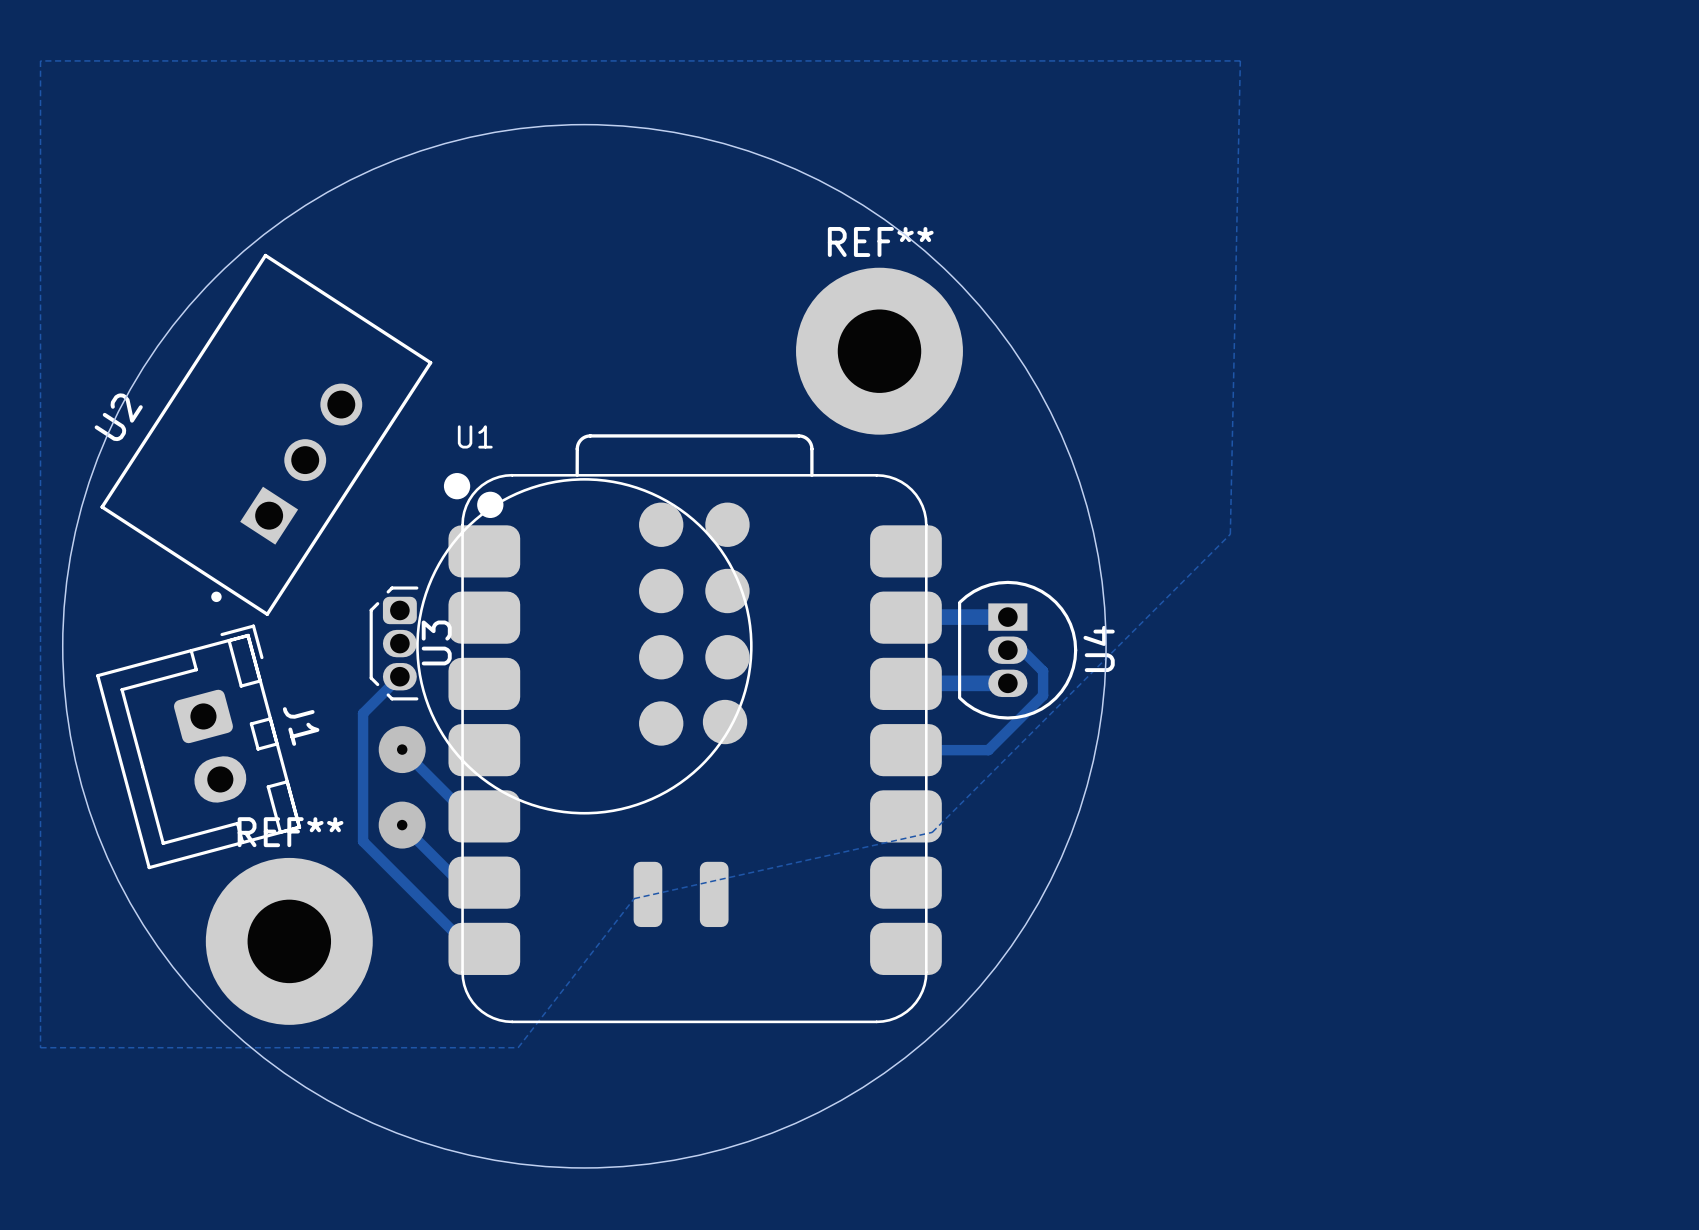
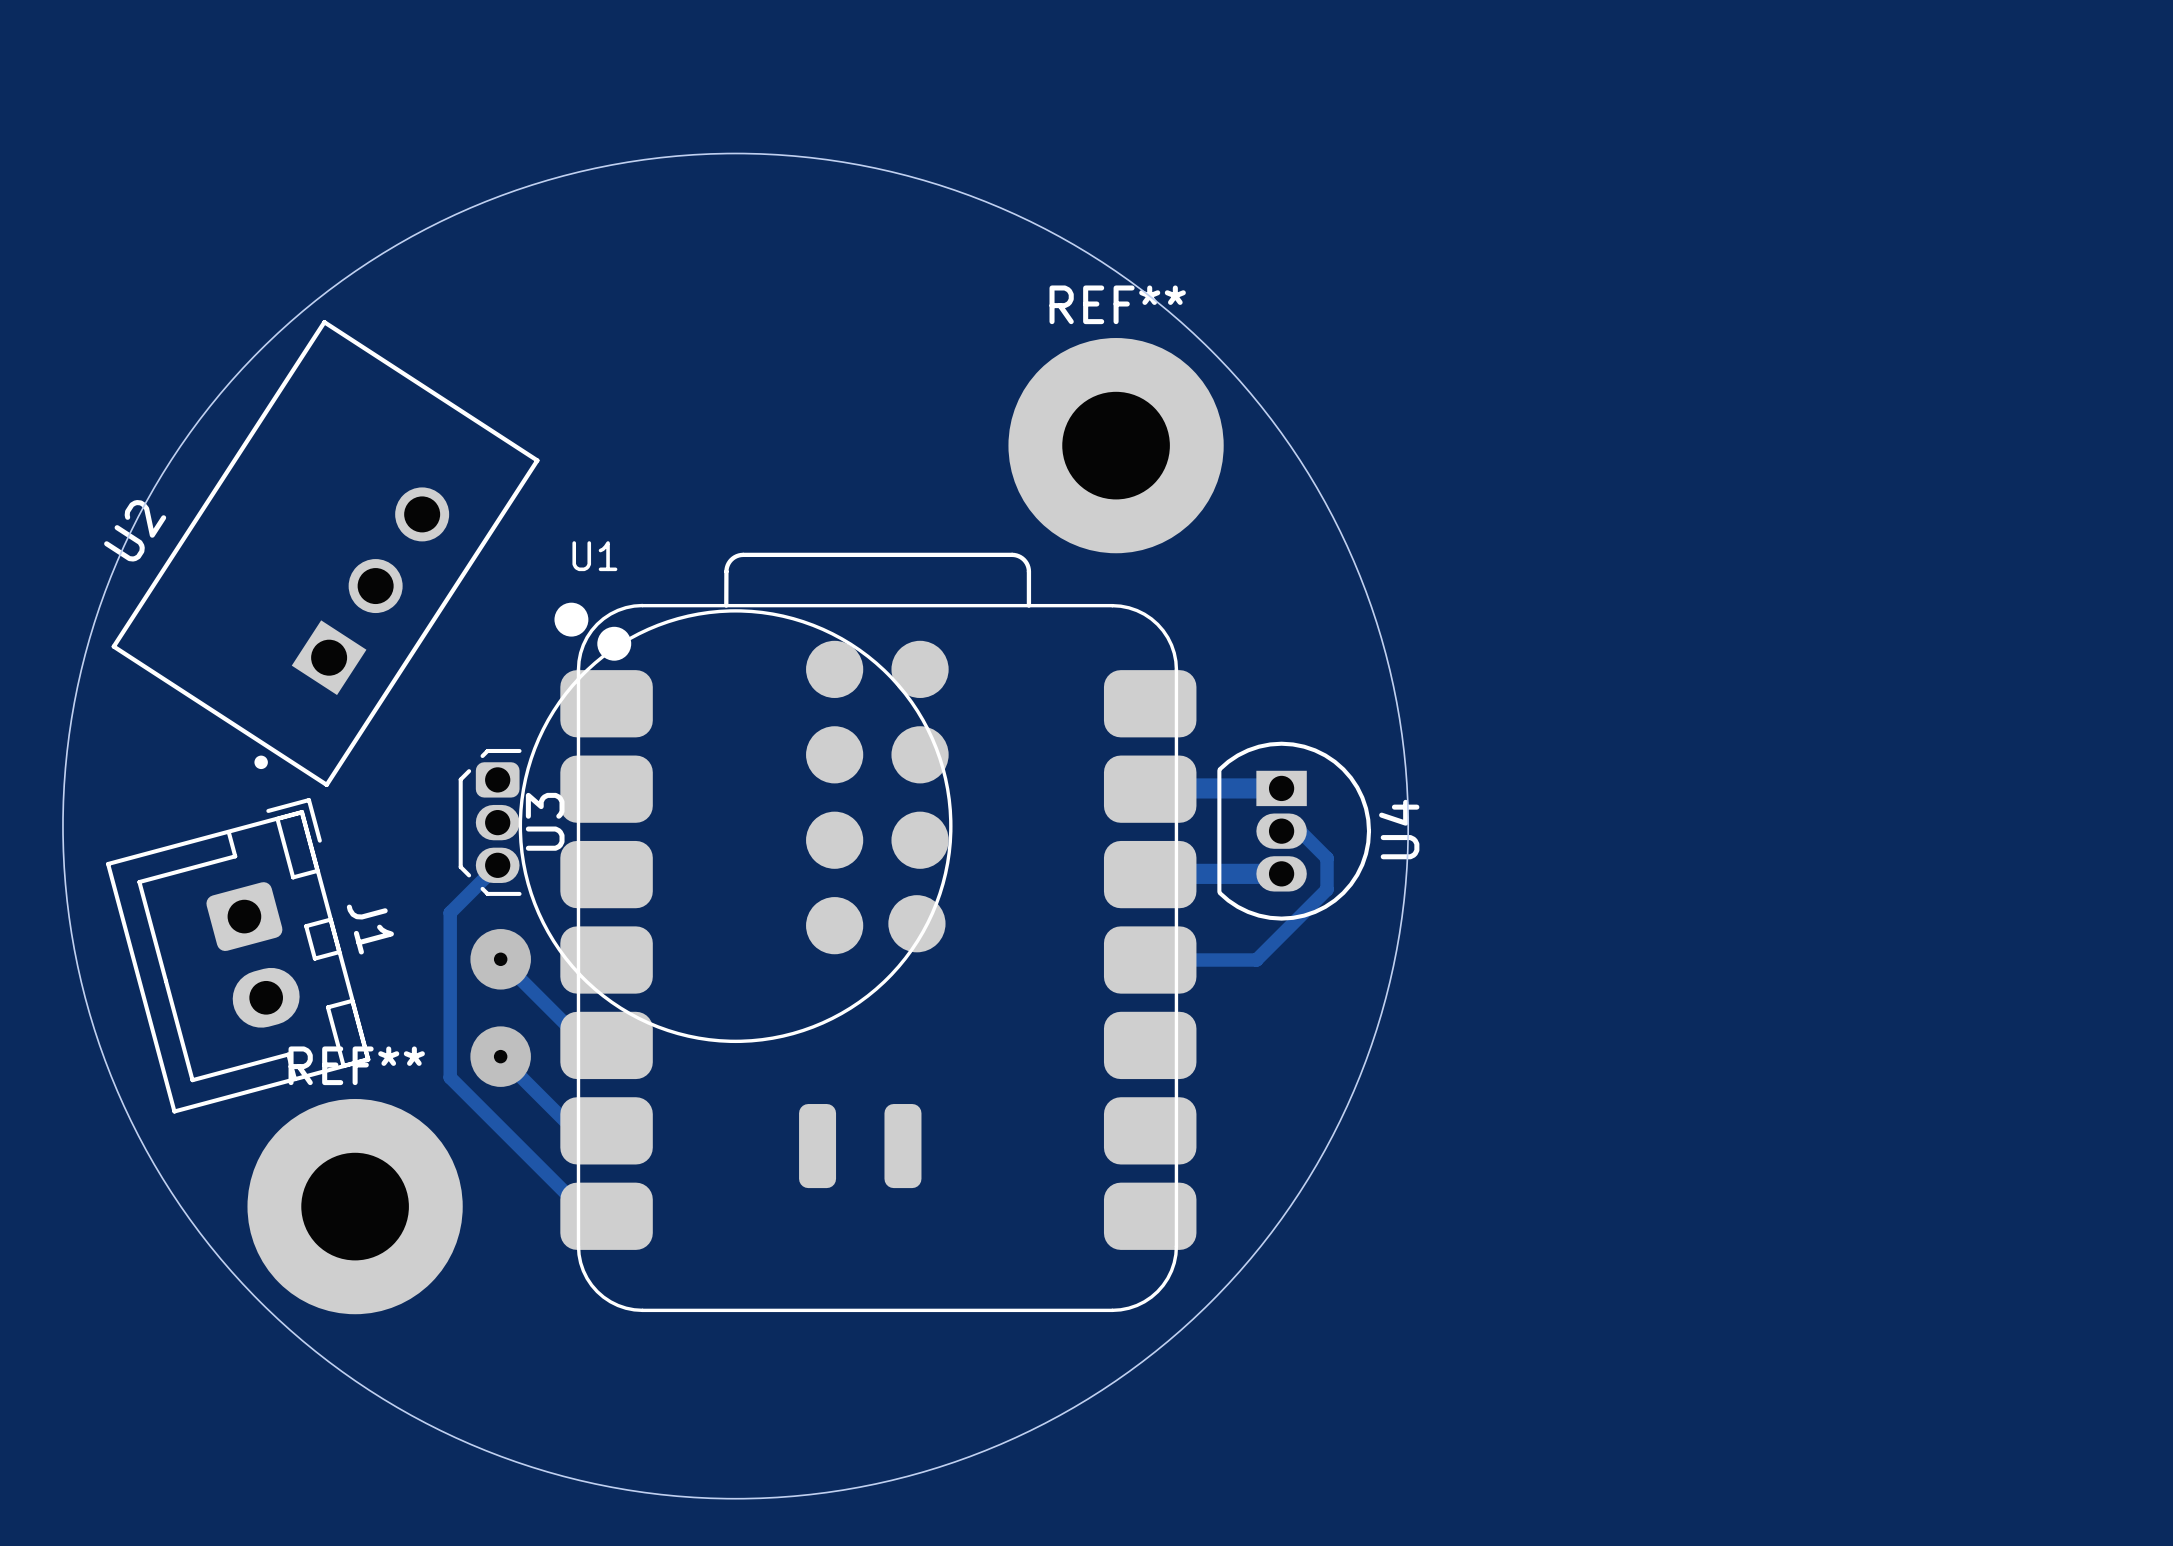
zone outline: (40, 60) (1240, 60) (1230, 534) (932, 832) (634, 898) (518, 1047) (40, 1047) (40, 60) -> none

